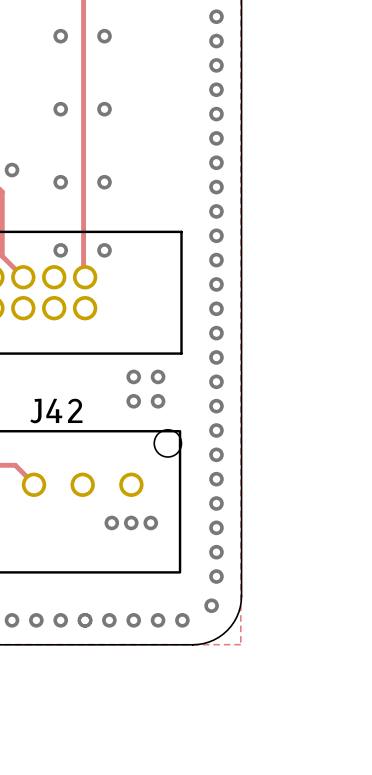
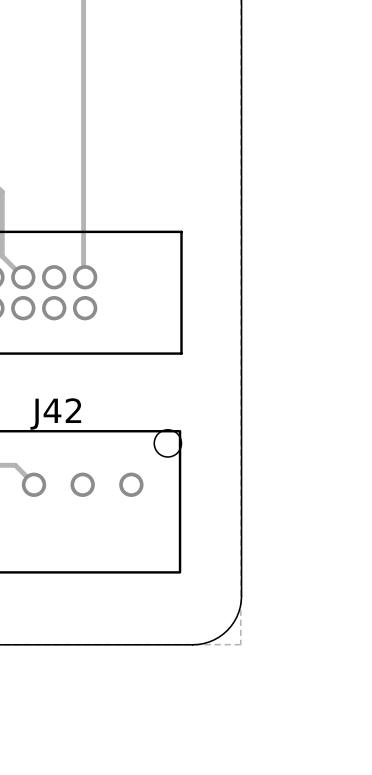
via: (216, 16) -> none
via: (60, 36) -> none
via: (104, 36) -> none
via: (216, 41) -> none
via: (216, 65) -> none
via: (216, 89) -> none
via: (60, 109) -> none
via: (104, 109) -> none
via: (216, 114) -> none
via: (216, 138) -> none
via: (216, 162) -> none
via: (12, 170) -> none
via: (60, 182) -> none
via: (104, 182) -> none
via: (216, 187) -> none
via: (216, 211) -> none
via: (216, 235) -> none
via: (60, 250) -> none
via: (104, 250) -> none
via: (216, 260) -> none
via: (216, 284) -> none
via: (216, 308) -> none
via: (216, 333) -> none
via: (216, 357) -> none
via: (133, 376) -> none
via: (158, 376) -> none
via: (216, 381) -> none
via: (133, 401) -> none
via: (158, 401) -> none
via: (216, 406) -> none
via: (216, 430) -> none
via: (216, 454) -> none
via: (216, 479) -> none
via: (216, 503) -> none
via: (111, 522) -> none
via: (131, 522) -> none
via: (150, 522) -> none
via: (216, 527) -> none
via: (216, 552) -> none
via: (216, 576) -> none
via: (211, 605) -> none
via: (12, 620) -> none
via: (36, 620) -> none
via: (60, 620) -> none
via: (85, 620) -> none
via: (109, 620) -> none
via: (133, 620) -> none
via: (158, 620) -> none
via: (182, 620) -> none

